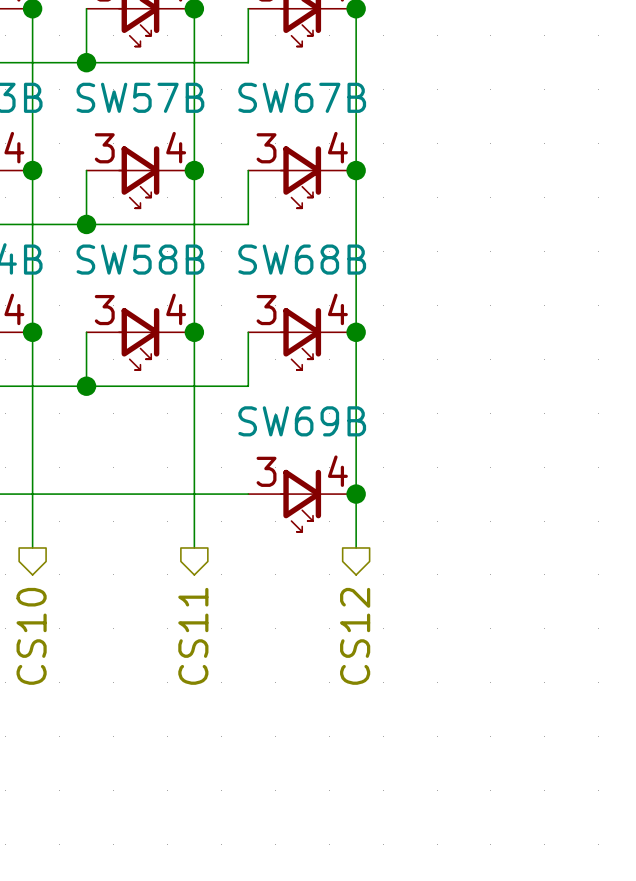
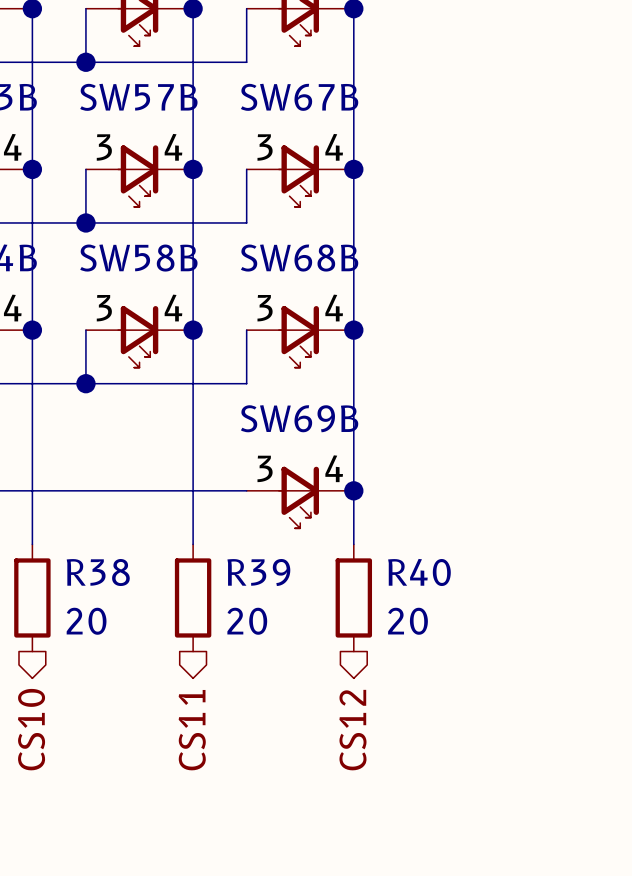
R38: none -> 20 (32, 597)
R39: none -> 20 (193, 597)
R40: none -> 20 (353, 597)
hierarchical label position: CS10 (31, 636) -> CS10 (31, 729)
hierarchical label position: CS11 (193, 636) -> CS11 (192, 730)
hierarchical label position: CS12 (355, 636) -> CS12 (352, 730)

